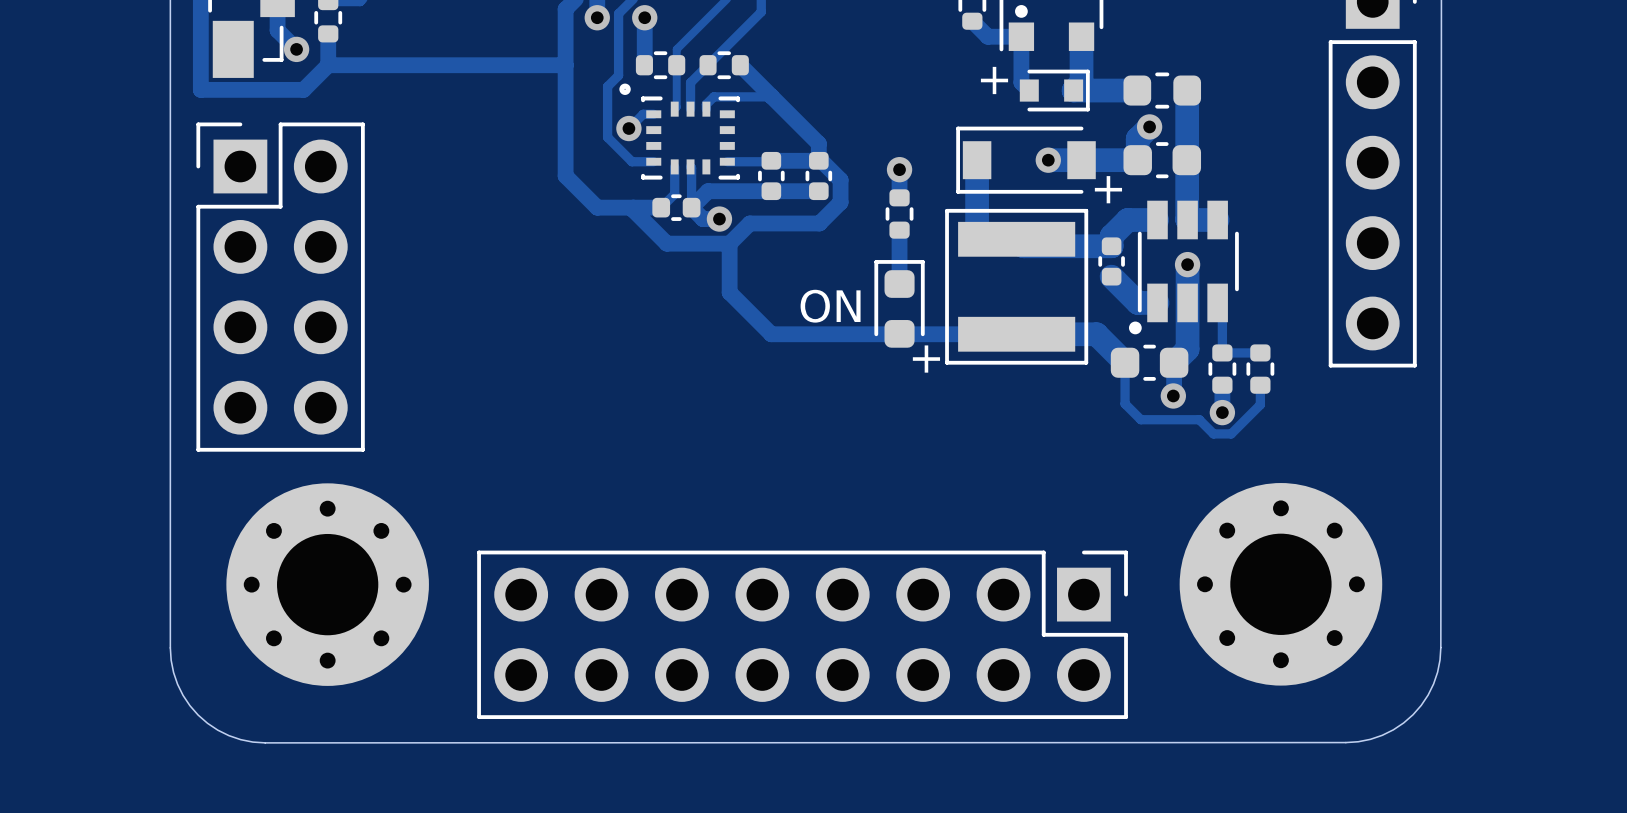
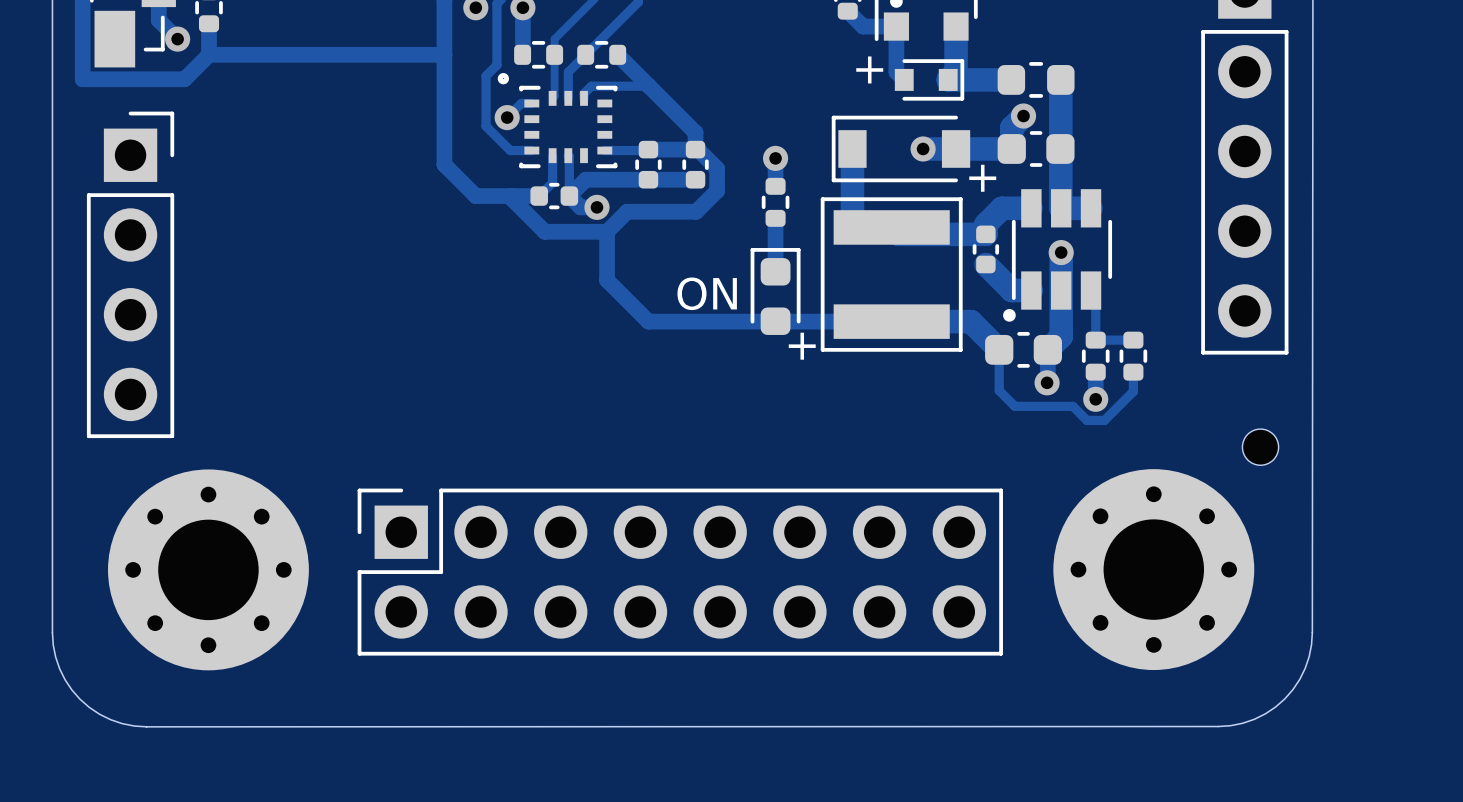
part footprint: [196, 122, 365, 452] -> [86, 111, 175, 439]
part: none -> (1260, 447)
part: none -> (680, 572)
part: (802, 634) -> none

